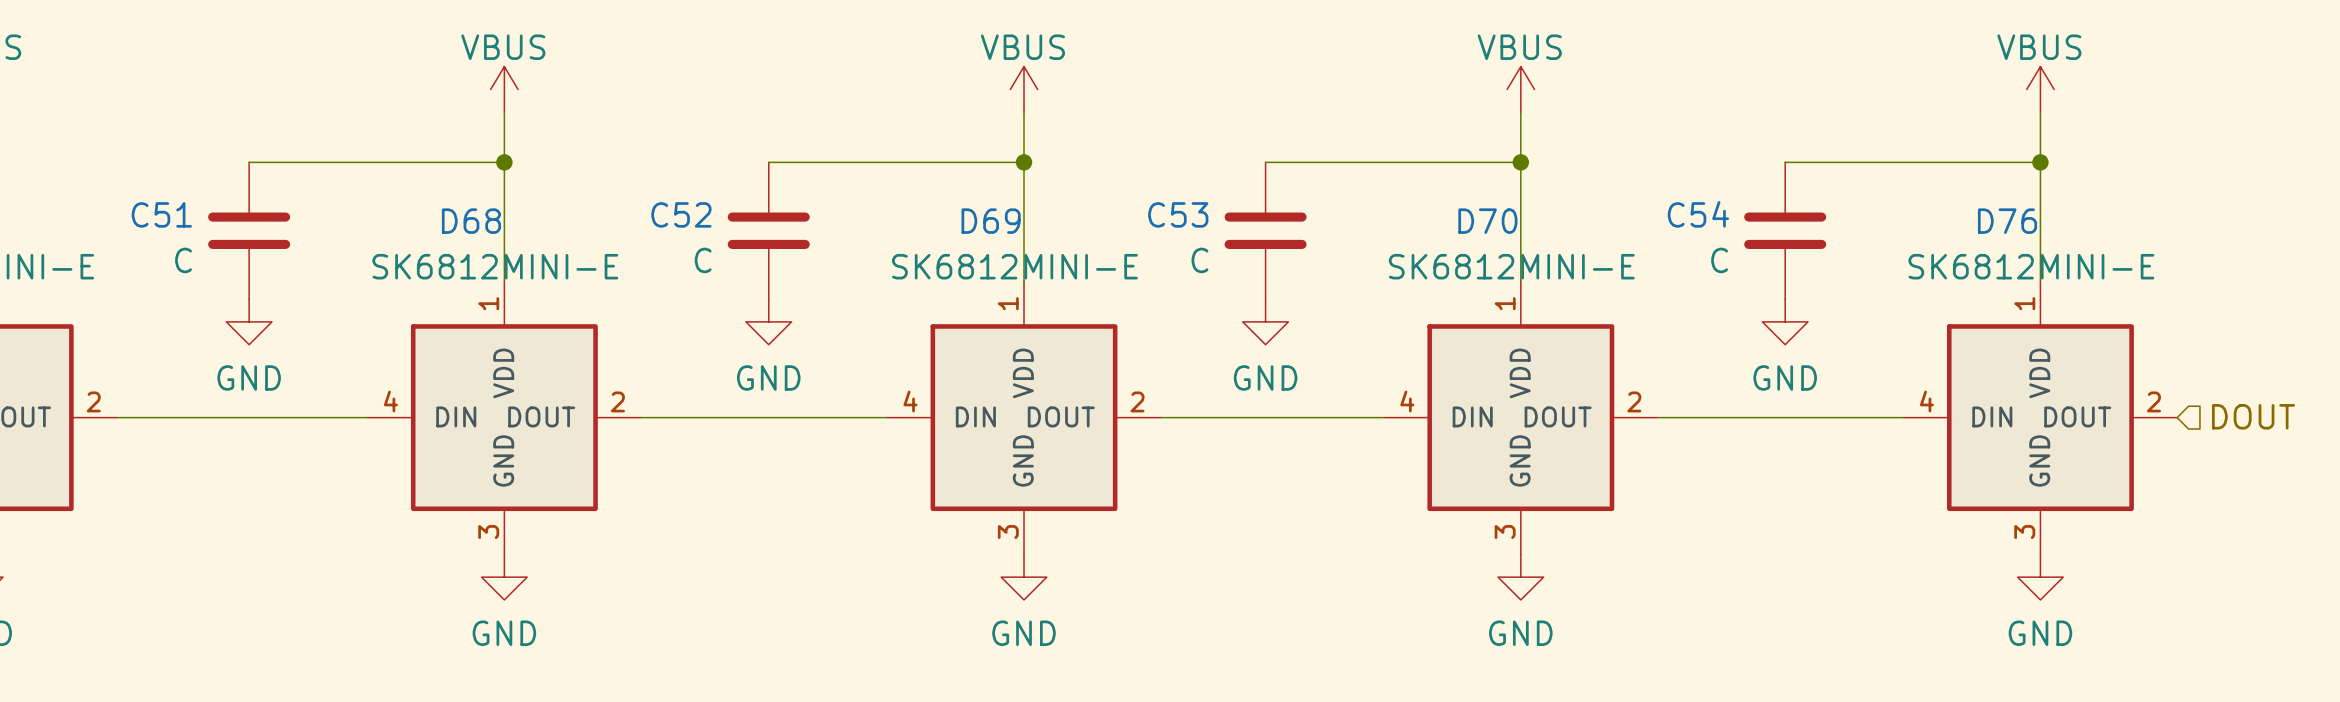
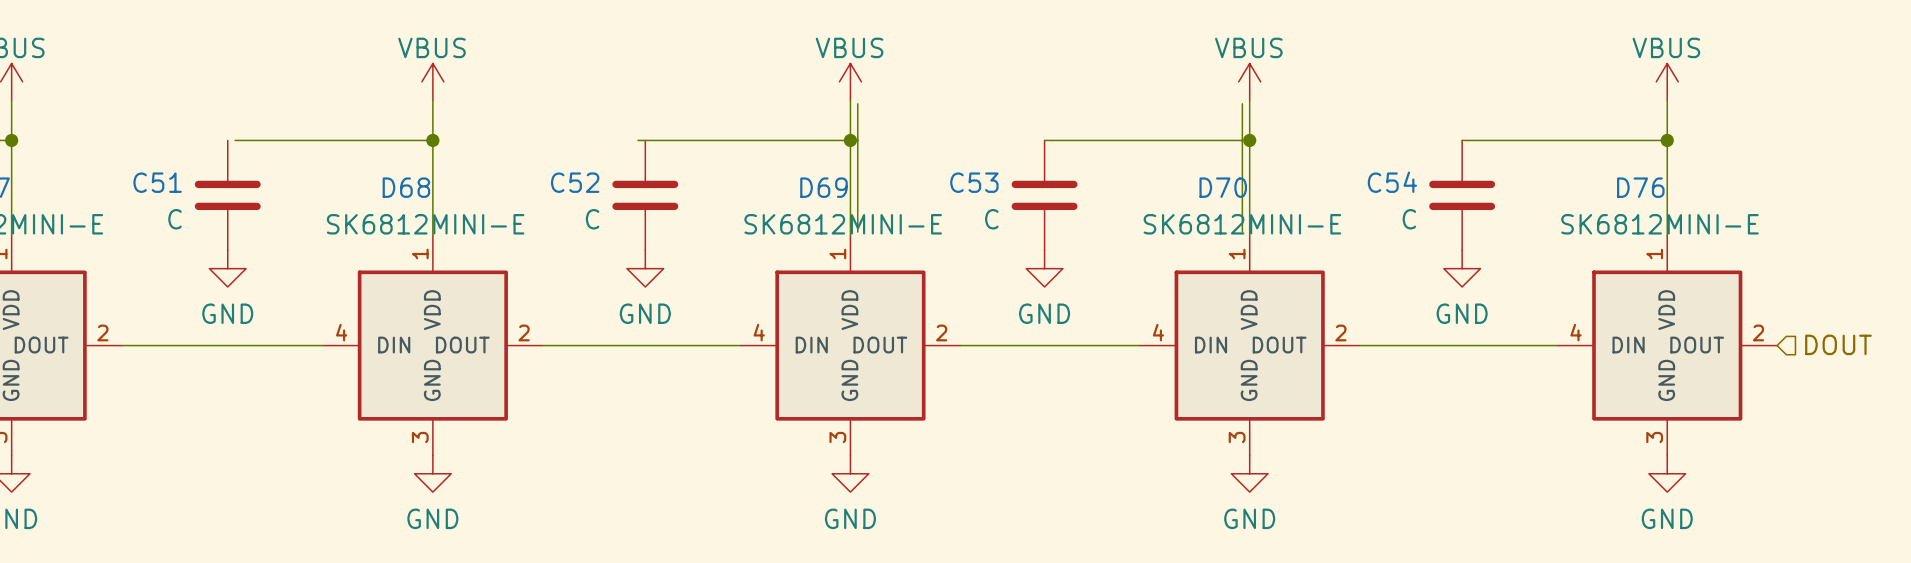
wire: none -> (857, 103) (857, 232)
wire: none -> (1242, 103) (1242, 232)
wire: (249, 162) (258, 162) -> none
wire: none -> (637, 140) (645, 140)

